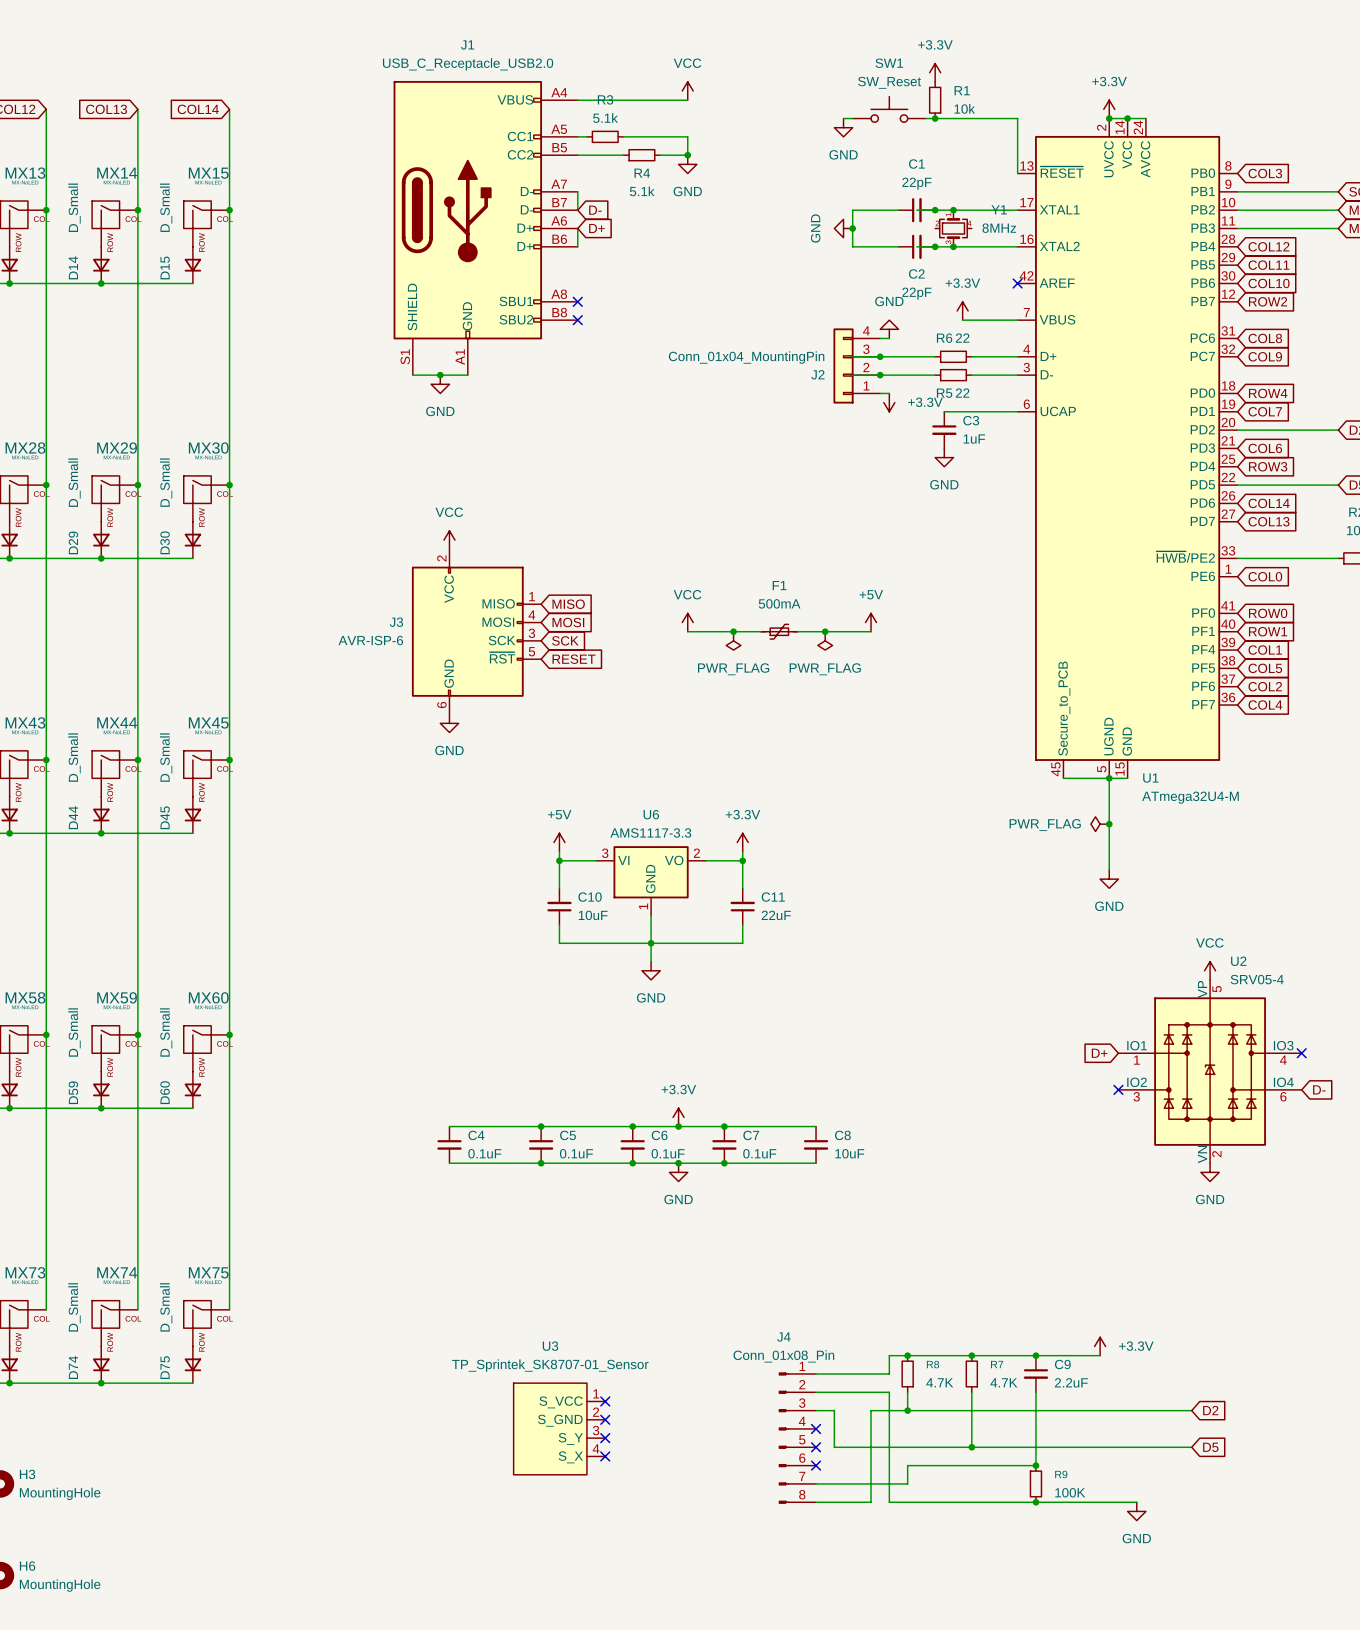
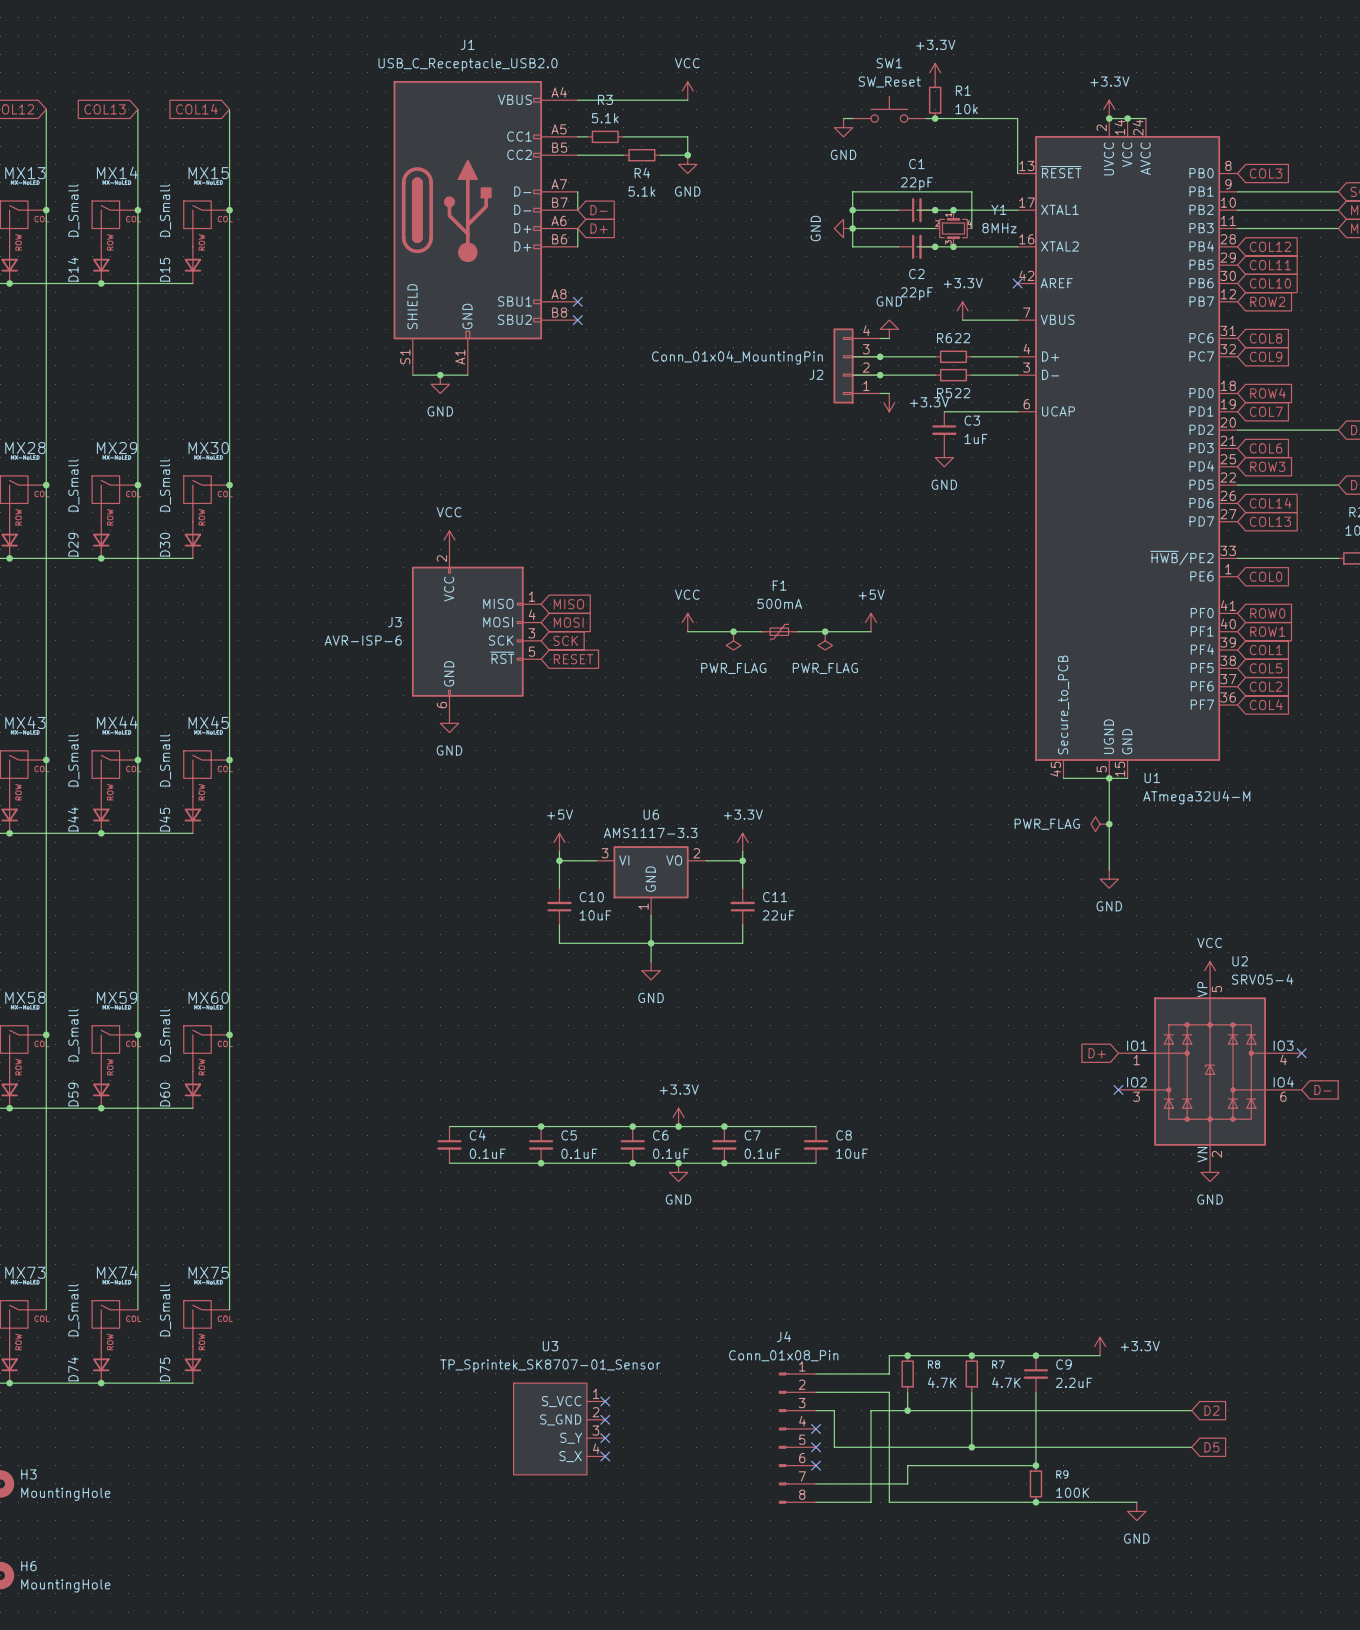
wire: none -> (852, 210) (852, 191) (971, 191) (971, 228)
junction: none -> (852, 210)
wire: none -> (852, 228) (935, 228)

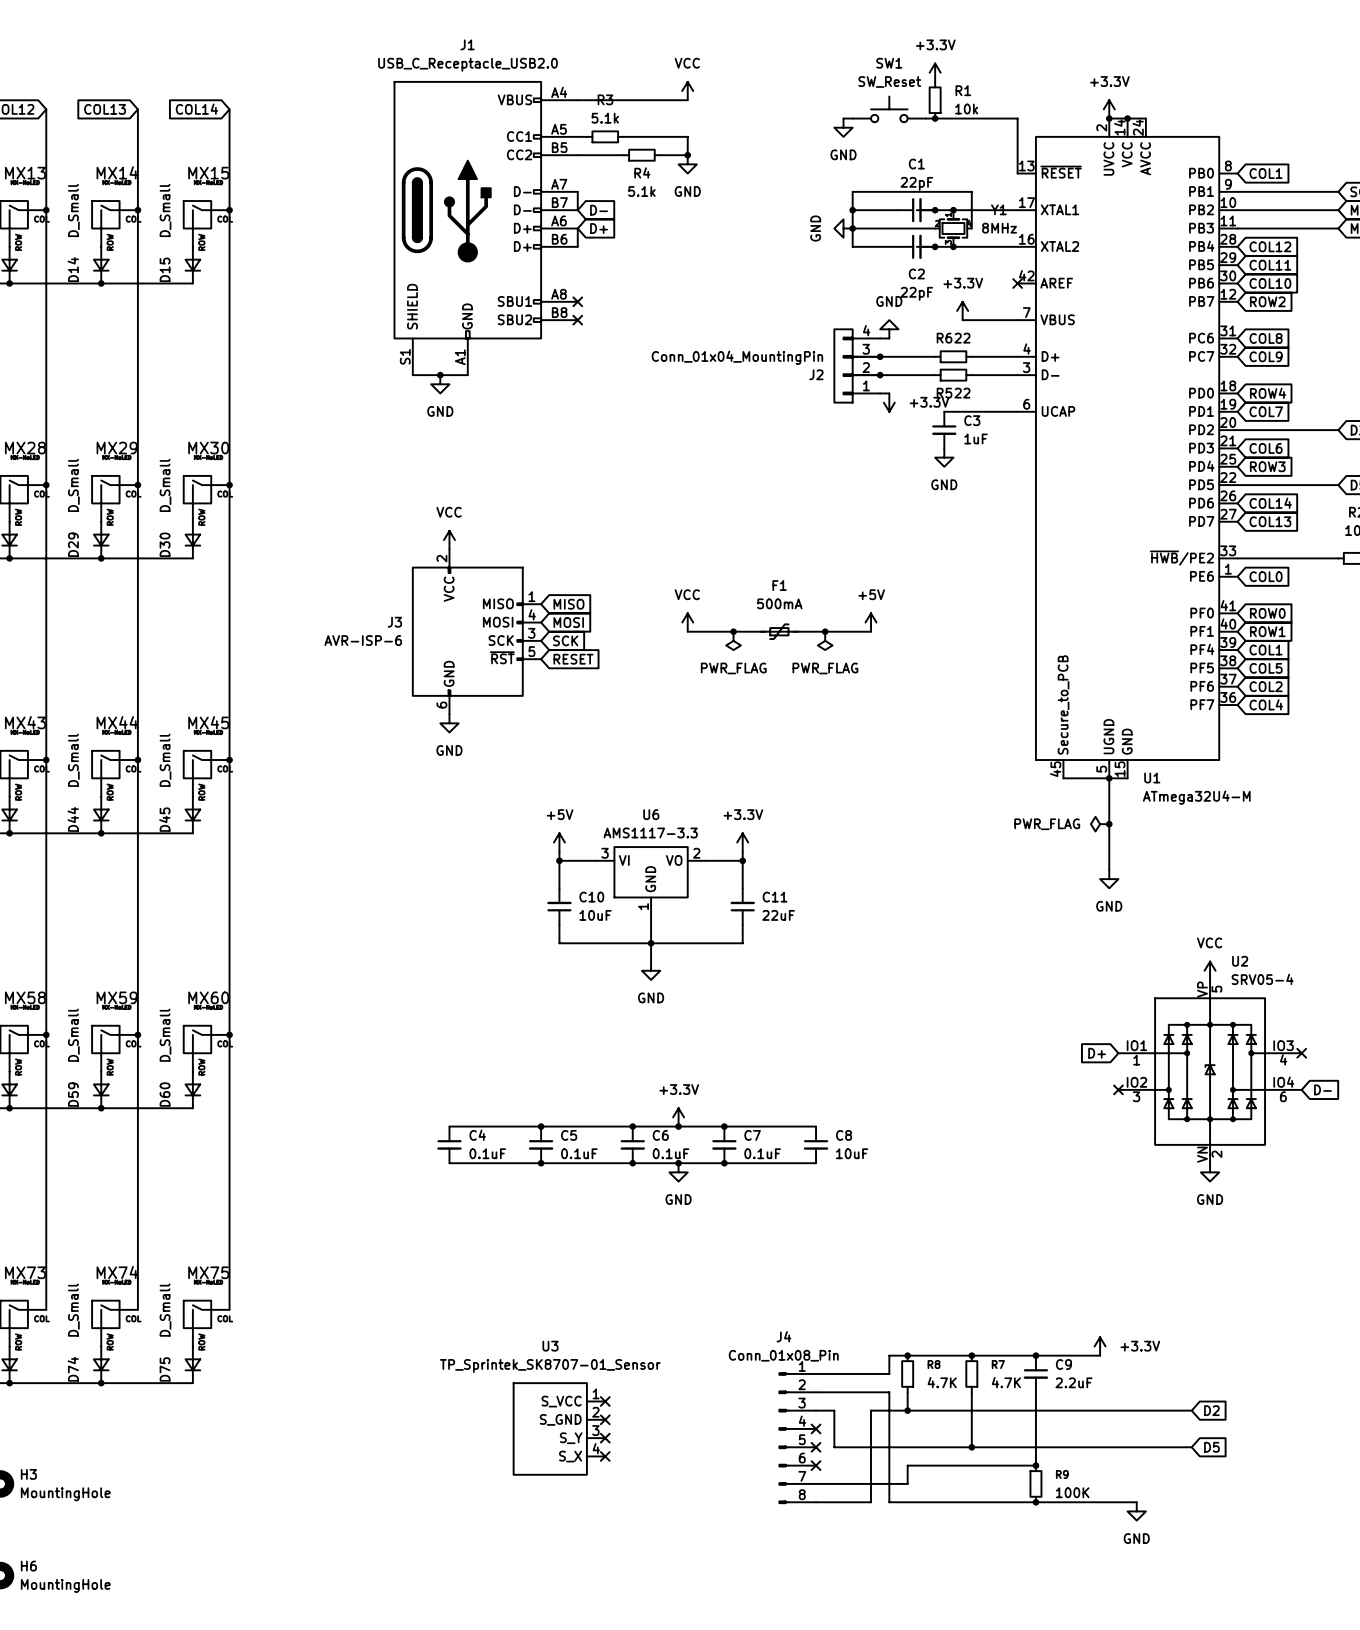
global label: COL3 (1266, 173) -> COL1 (1266, 173)

